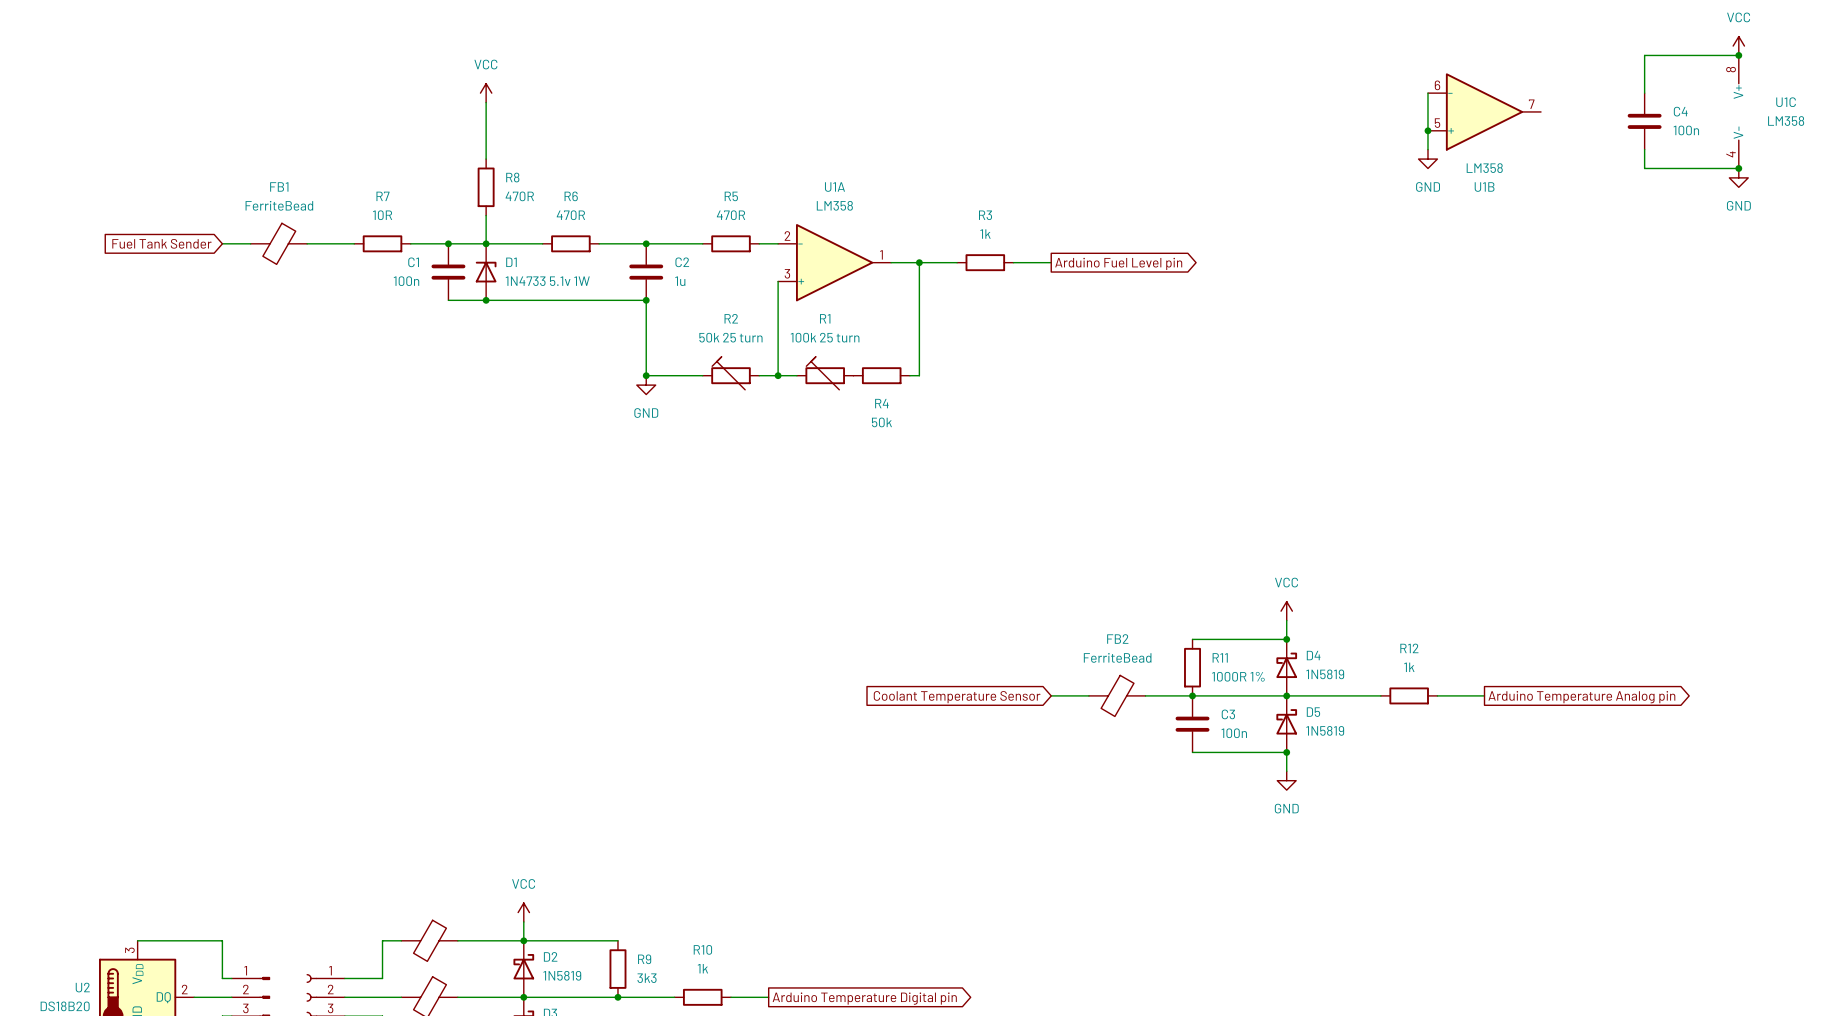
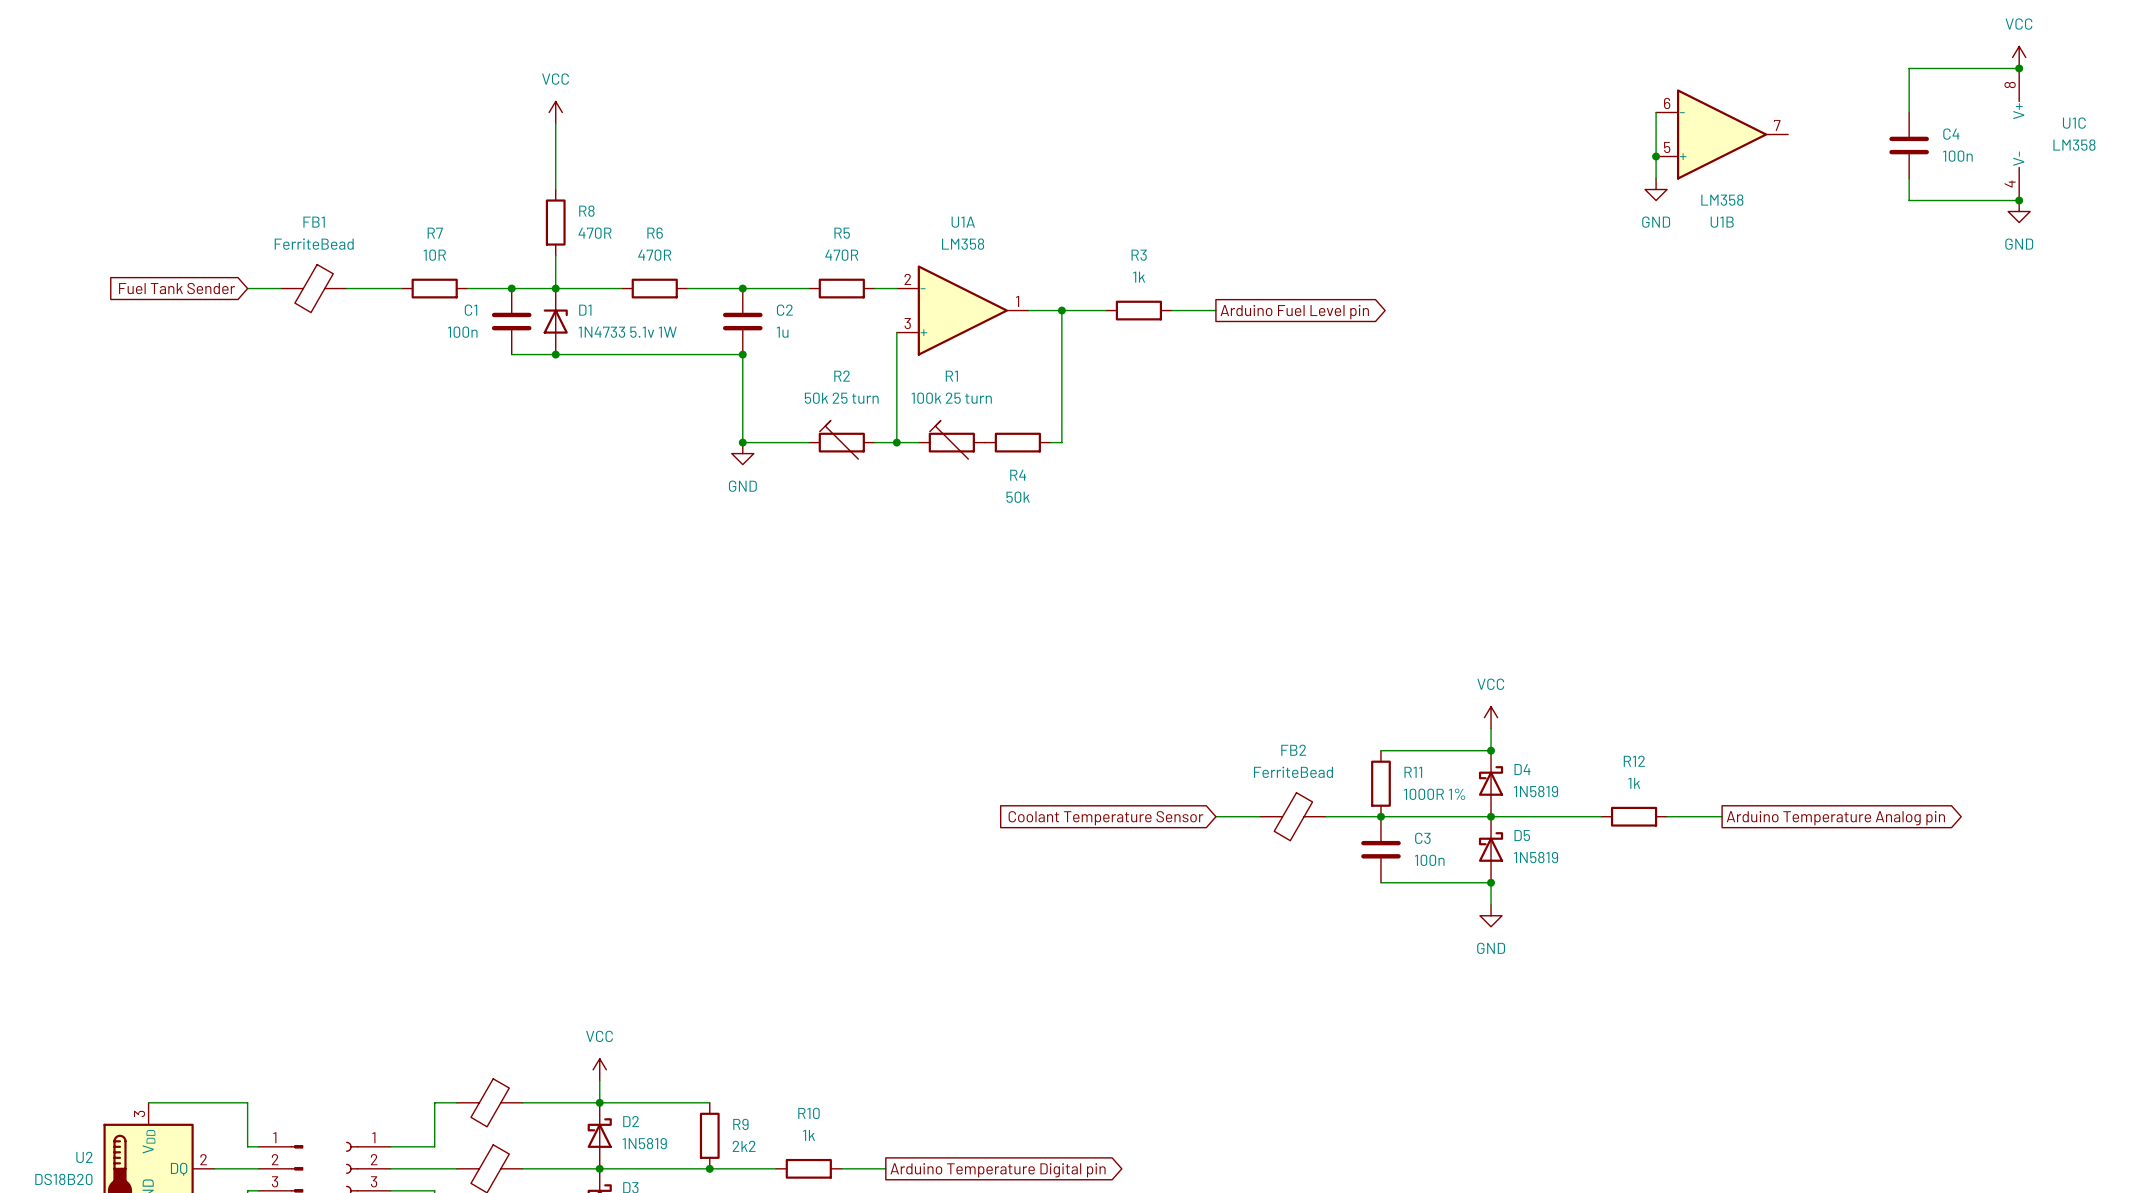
R9 value: 3k3 (647, 978) -> 2k2 (744, 1146)

